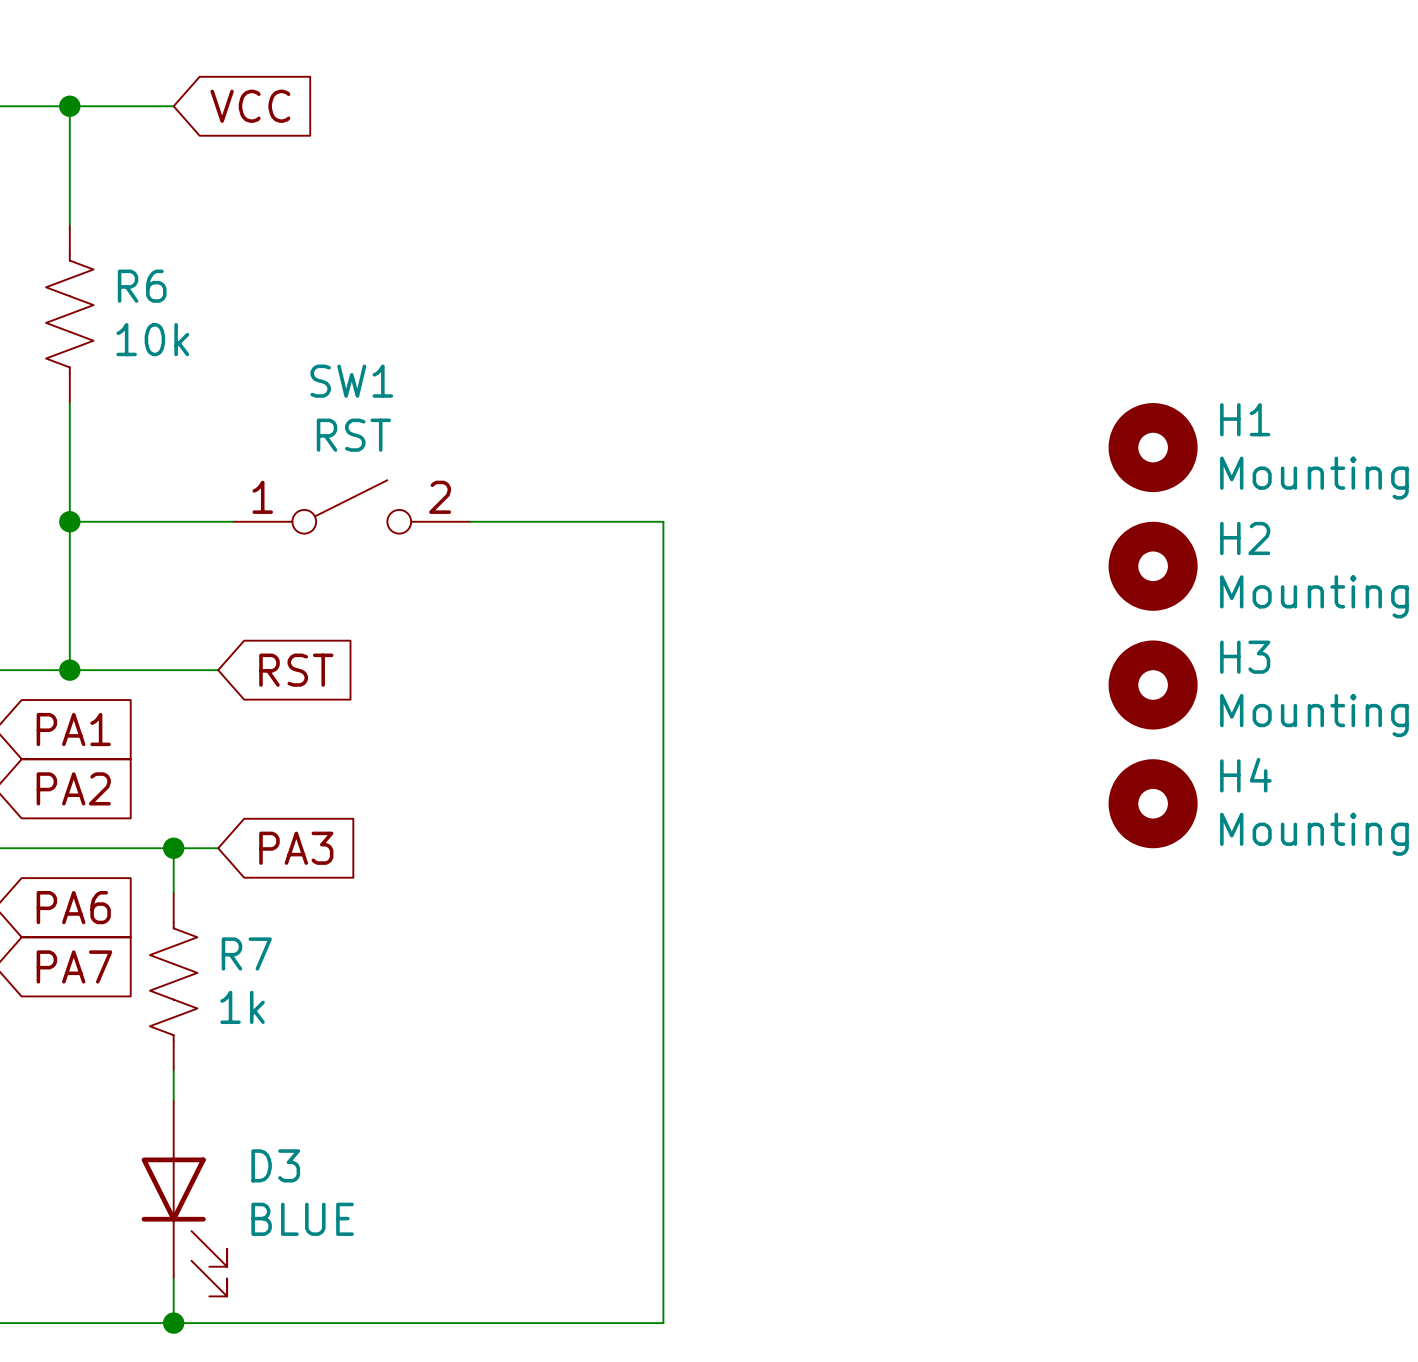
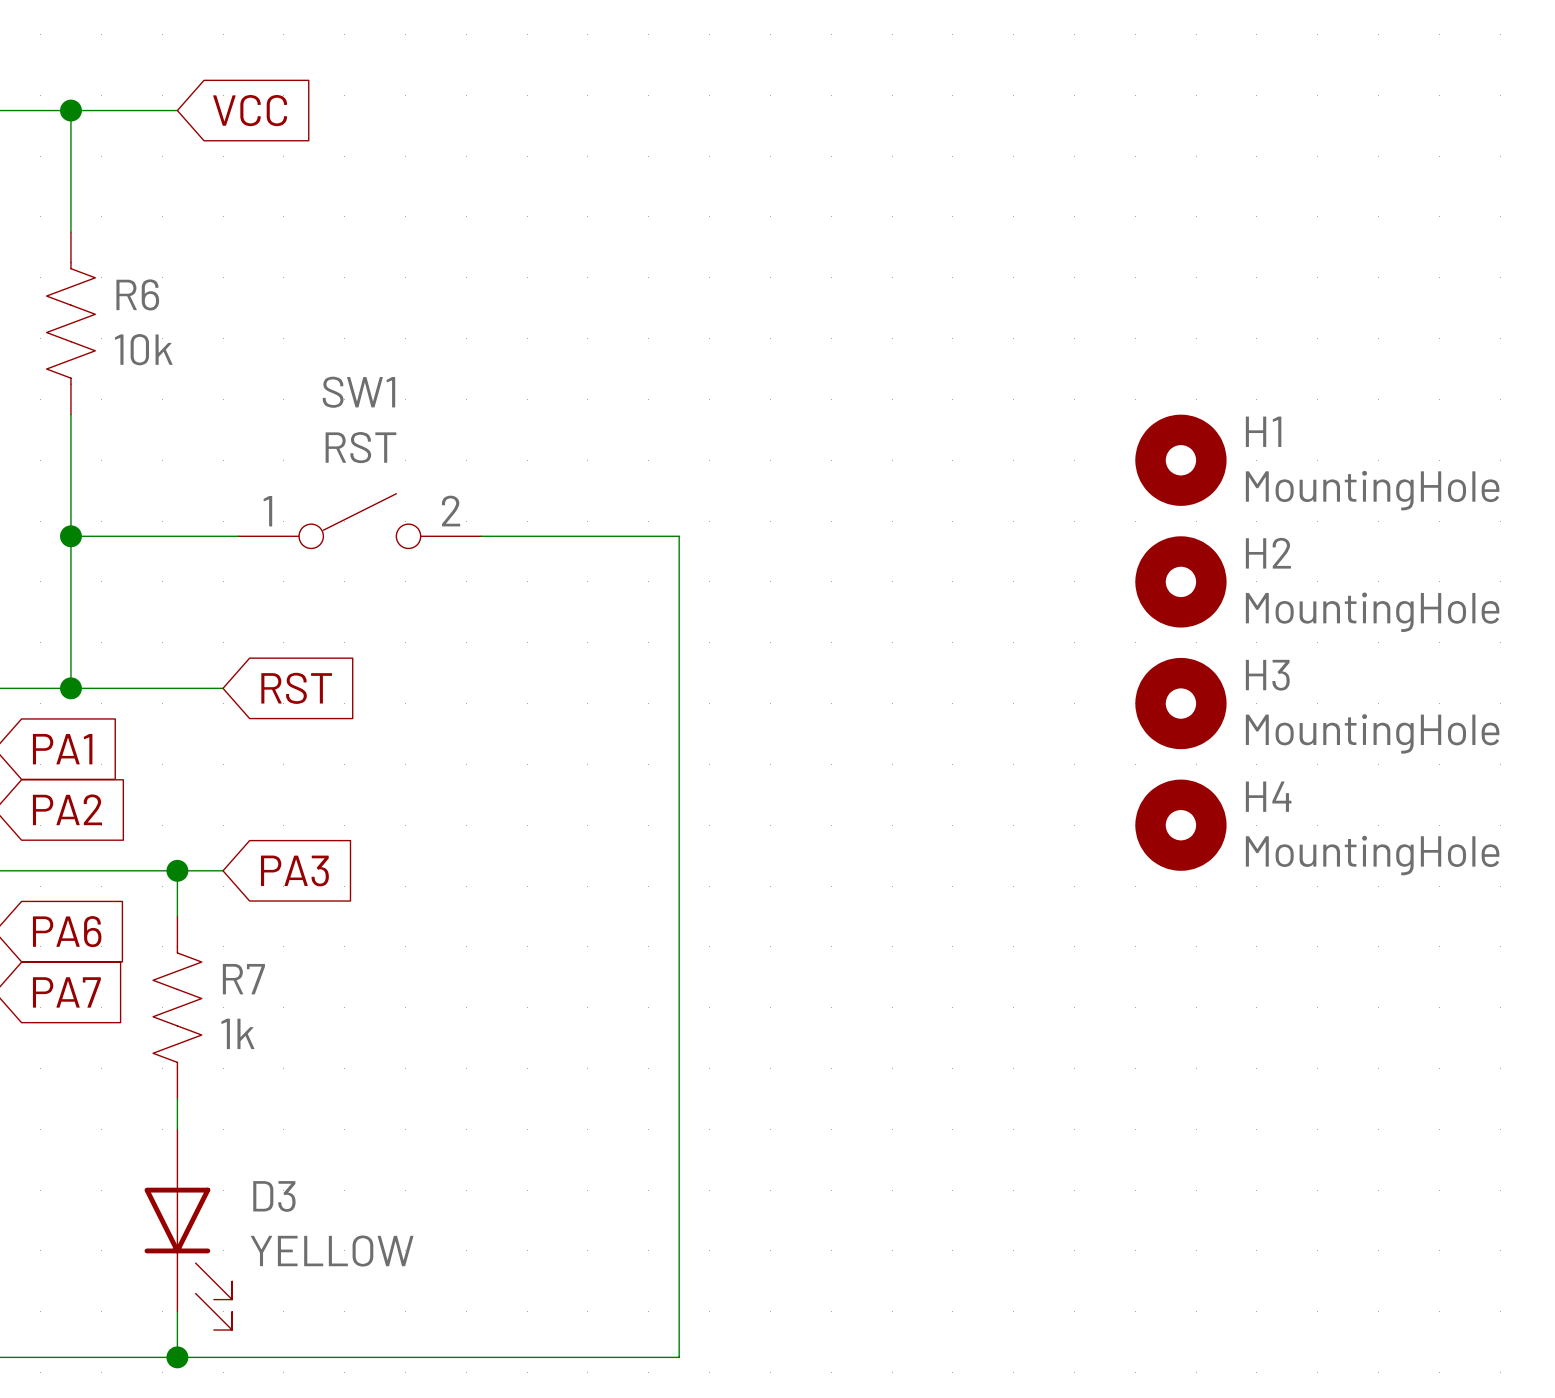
D3 value: BLUE (302, 1219) -> YELLOW (332, 1251)

